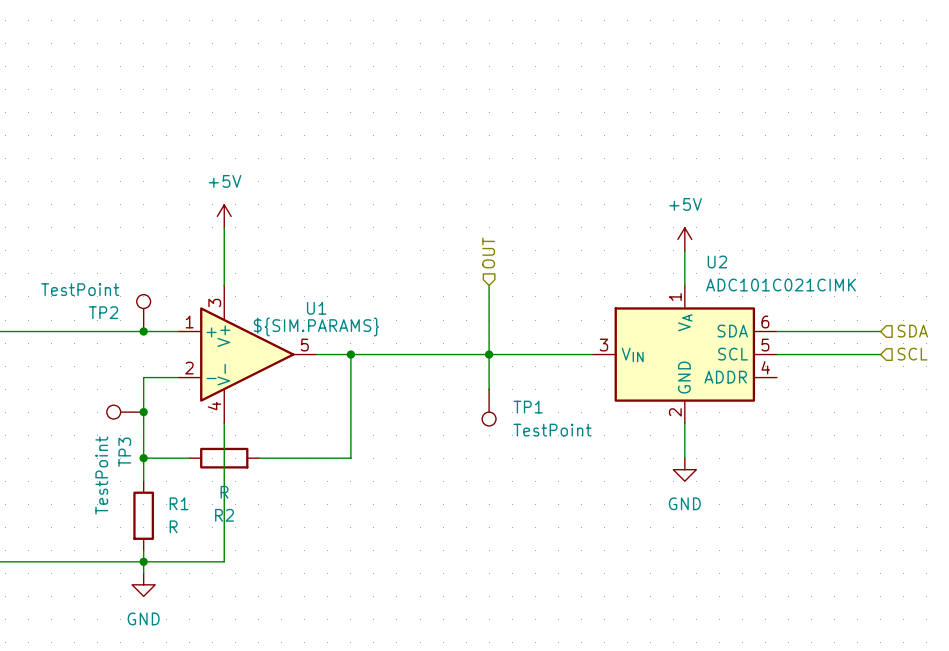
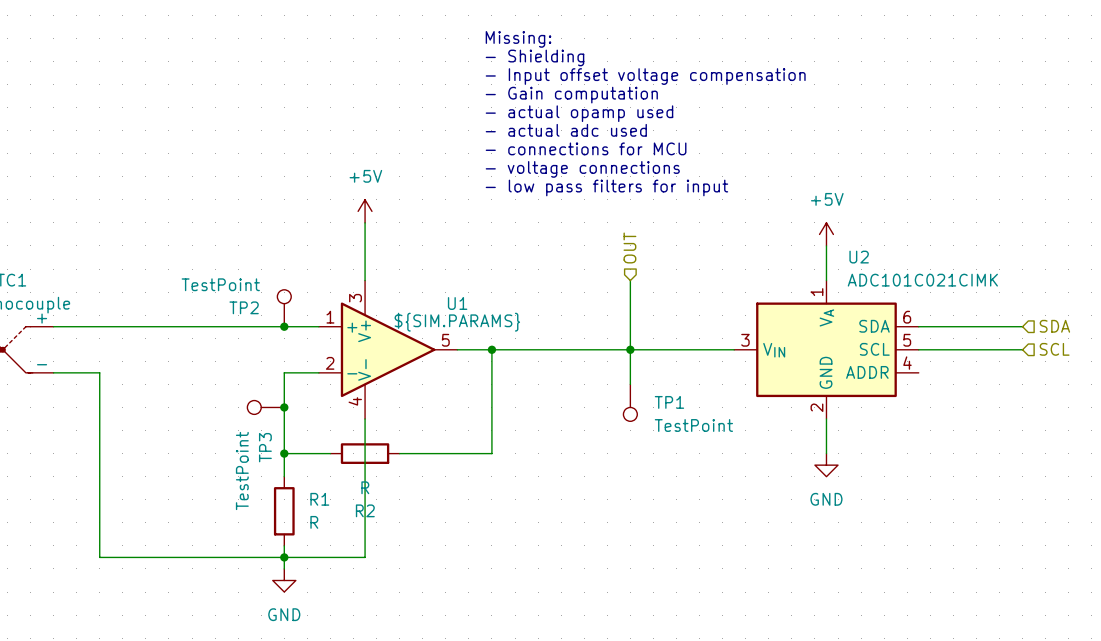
text: none -> Missing: (518, 39)
text: none -> - Shielding (534, 57)
text: none -> - Input offset voltage compensation (645, 76)
text: none -> - Gain computation (571, 95)
text: none -> - actual opamp used (579, 113)
text: none -> - actual adc used (566, 130)
text: none -> - connections for MCU (586, 148)
text: none -> - voltage connections (582, 169)
text: none -> - low pass filters for input (606, 187)

